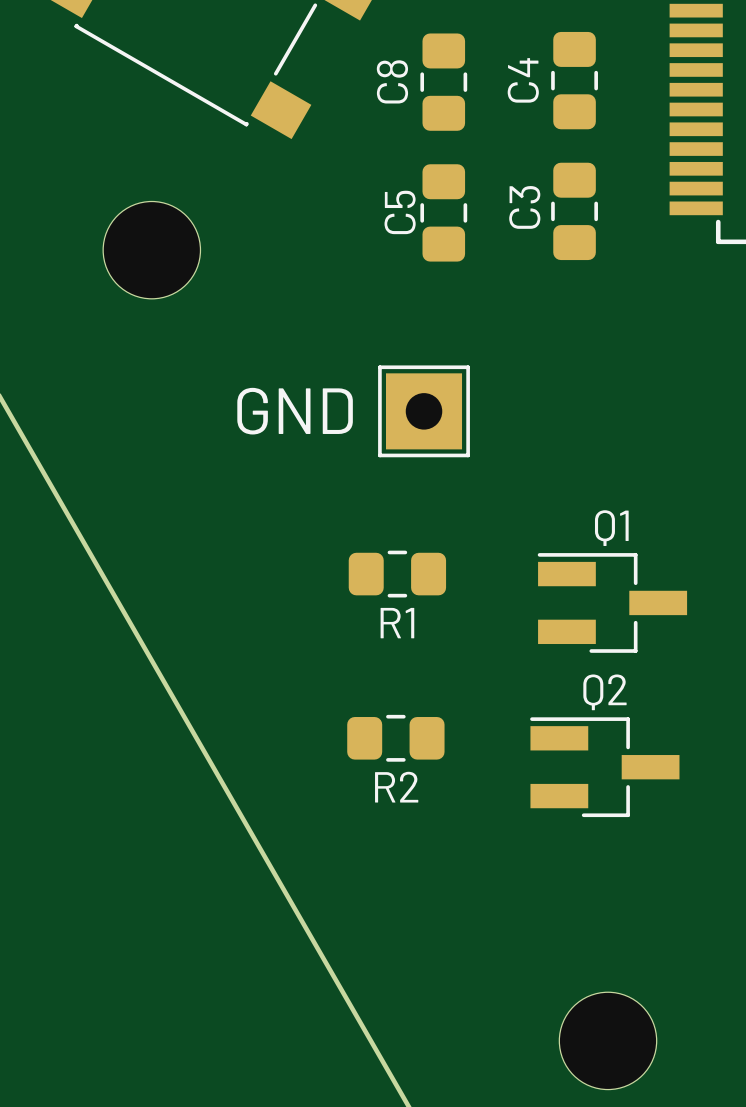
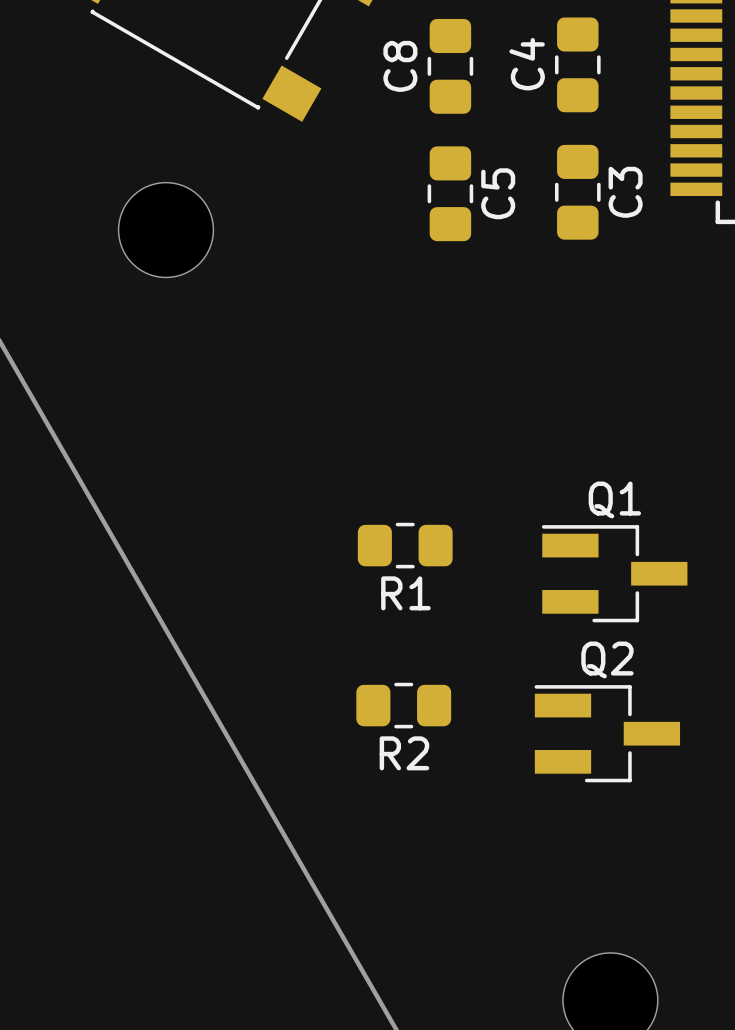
C3 name position: C3 (524, 207) -> C3 (625, 192)
C5 name position: C5 (400, 212) -> C5 (498, 193)
text: GND (295, 411) -> none
part: (424, 411) -> none

